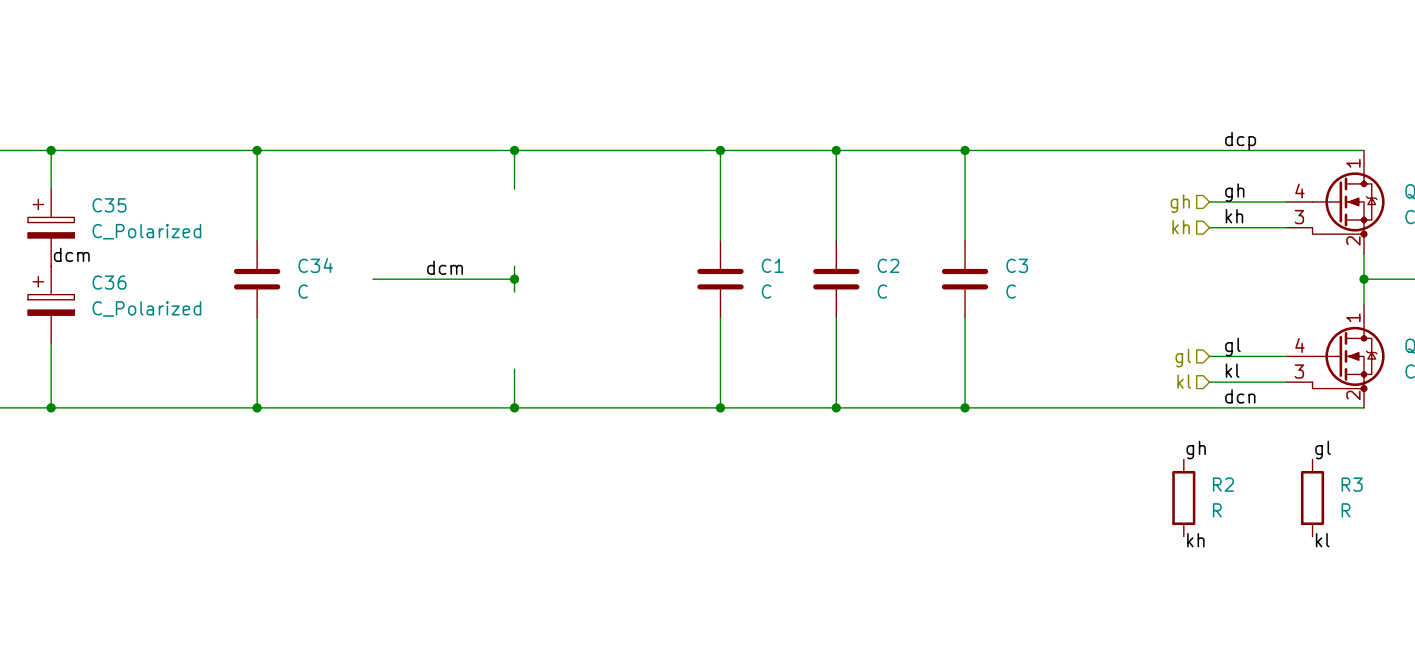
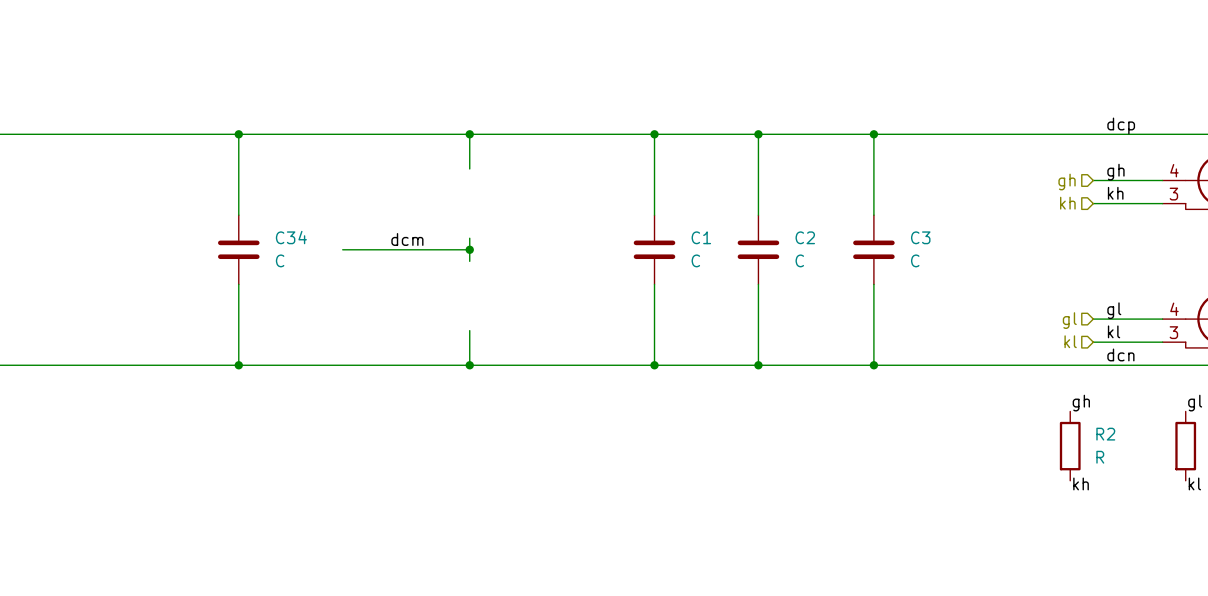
wire: (51, 150) (51, 189) -> none
junction: (51, 150) -> none
C35: C_Polarized (51, 227) -> none
label: dcm (71, 254) -> none
C36: C_Polarized (51, 304) -> none
wire: (51, 343) (51, 407) -> none
junction: (51, 407) -> none

